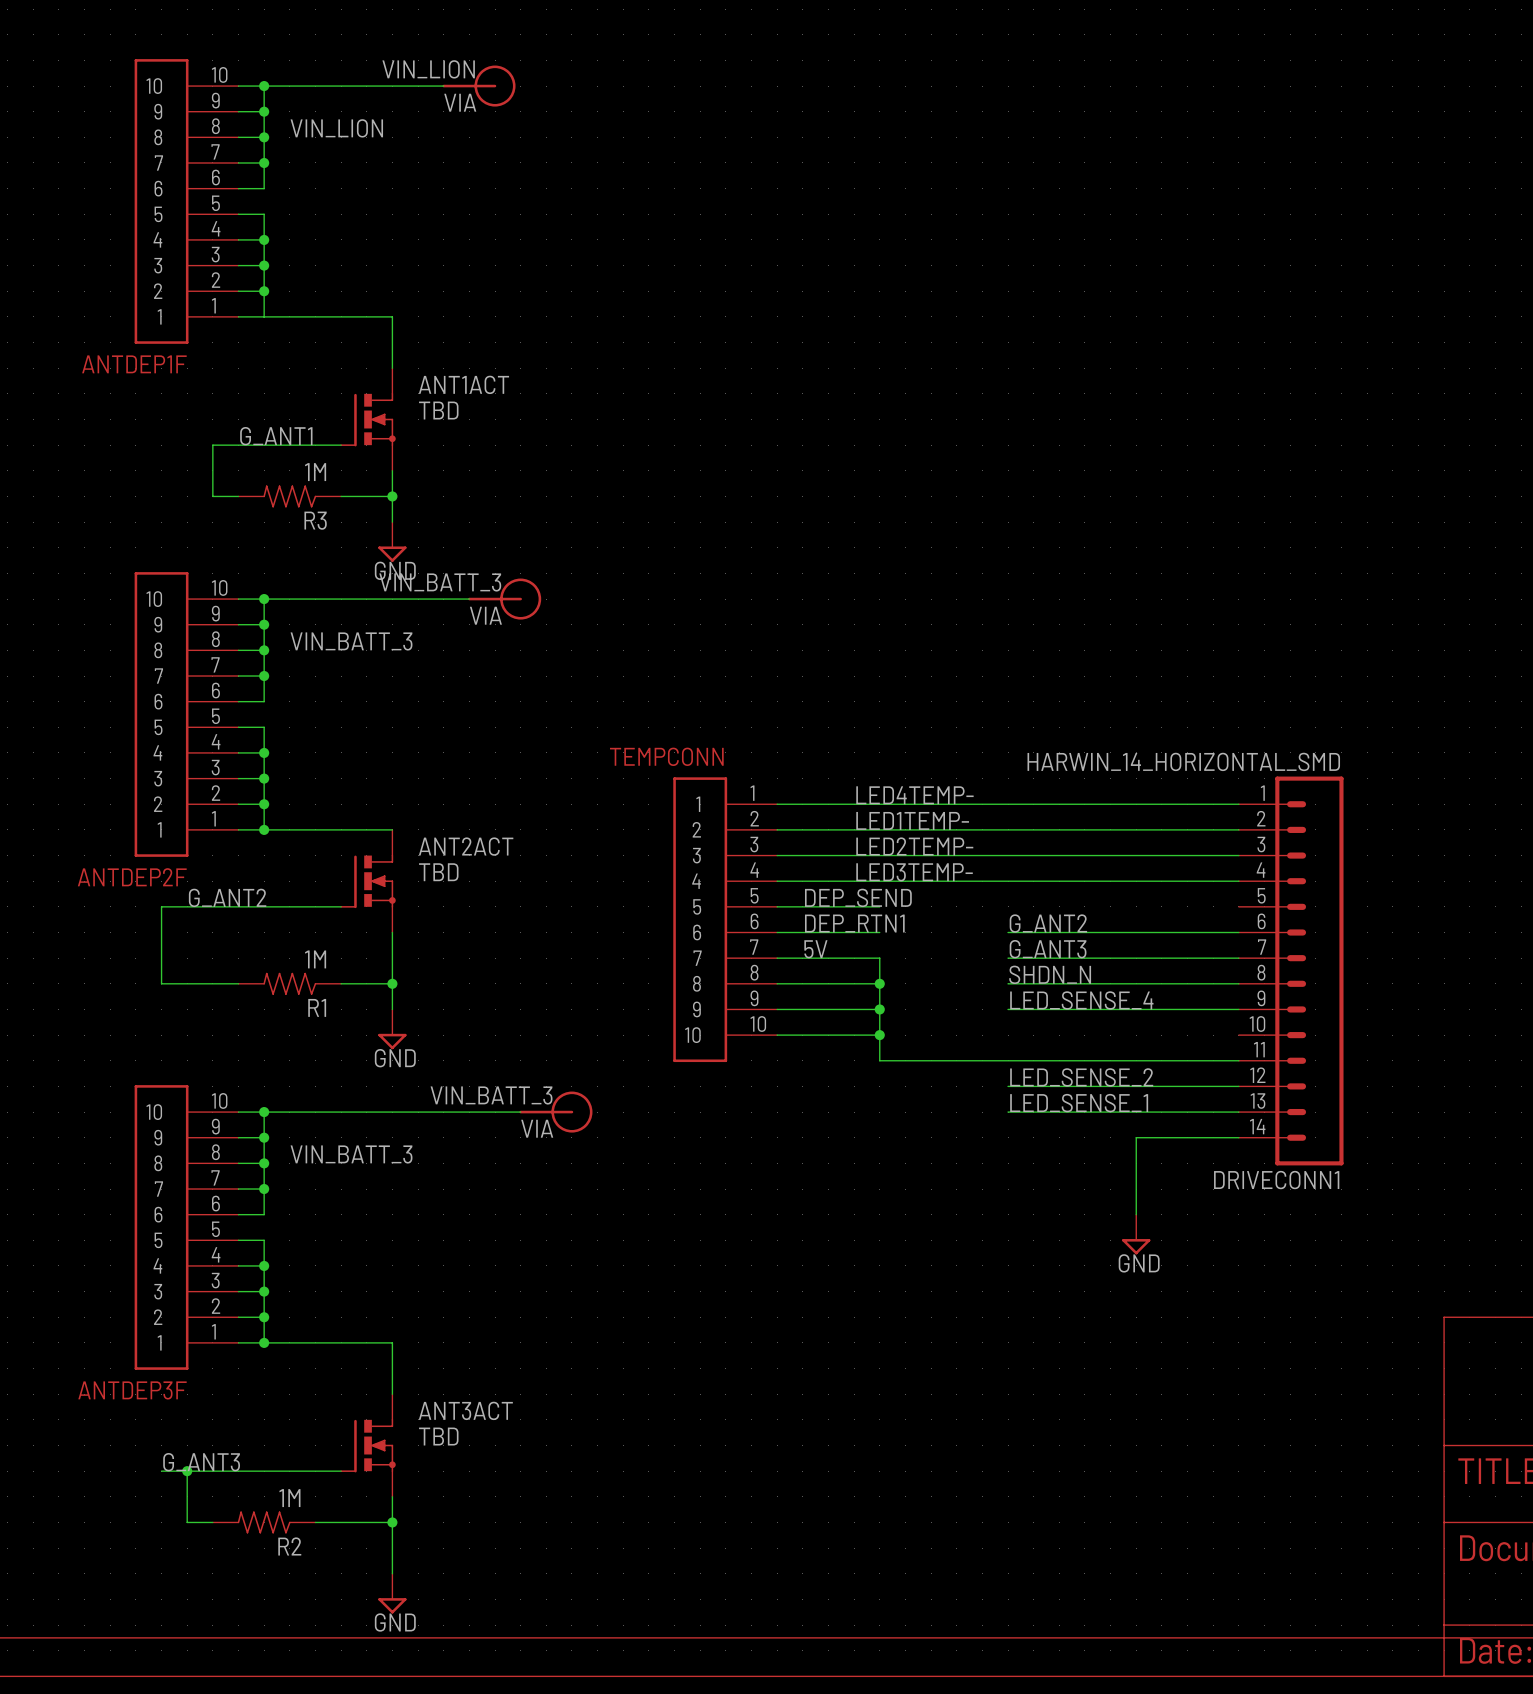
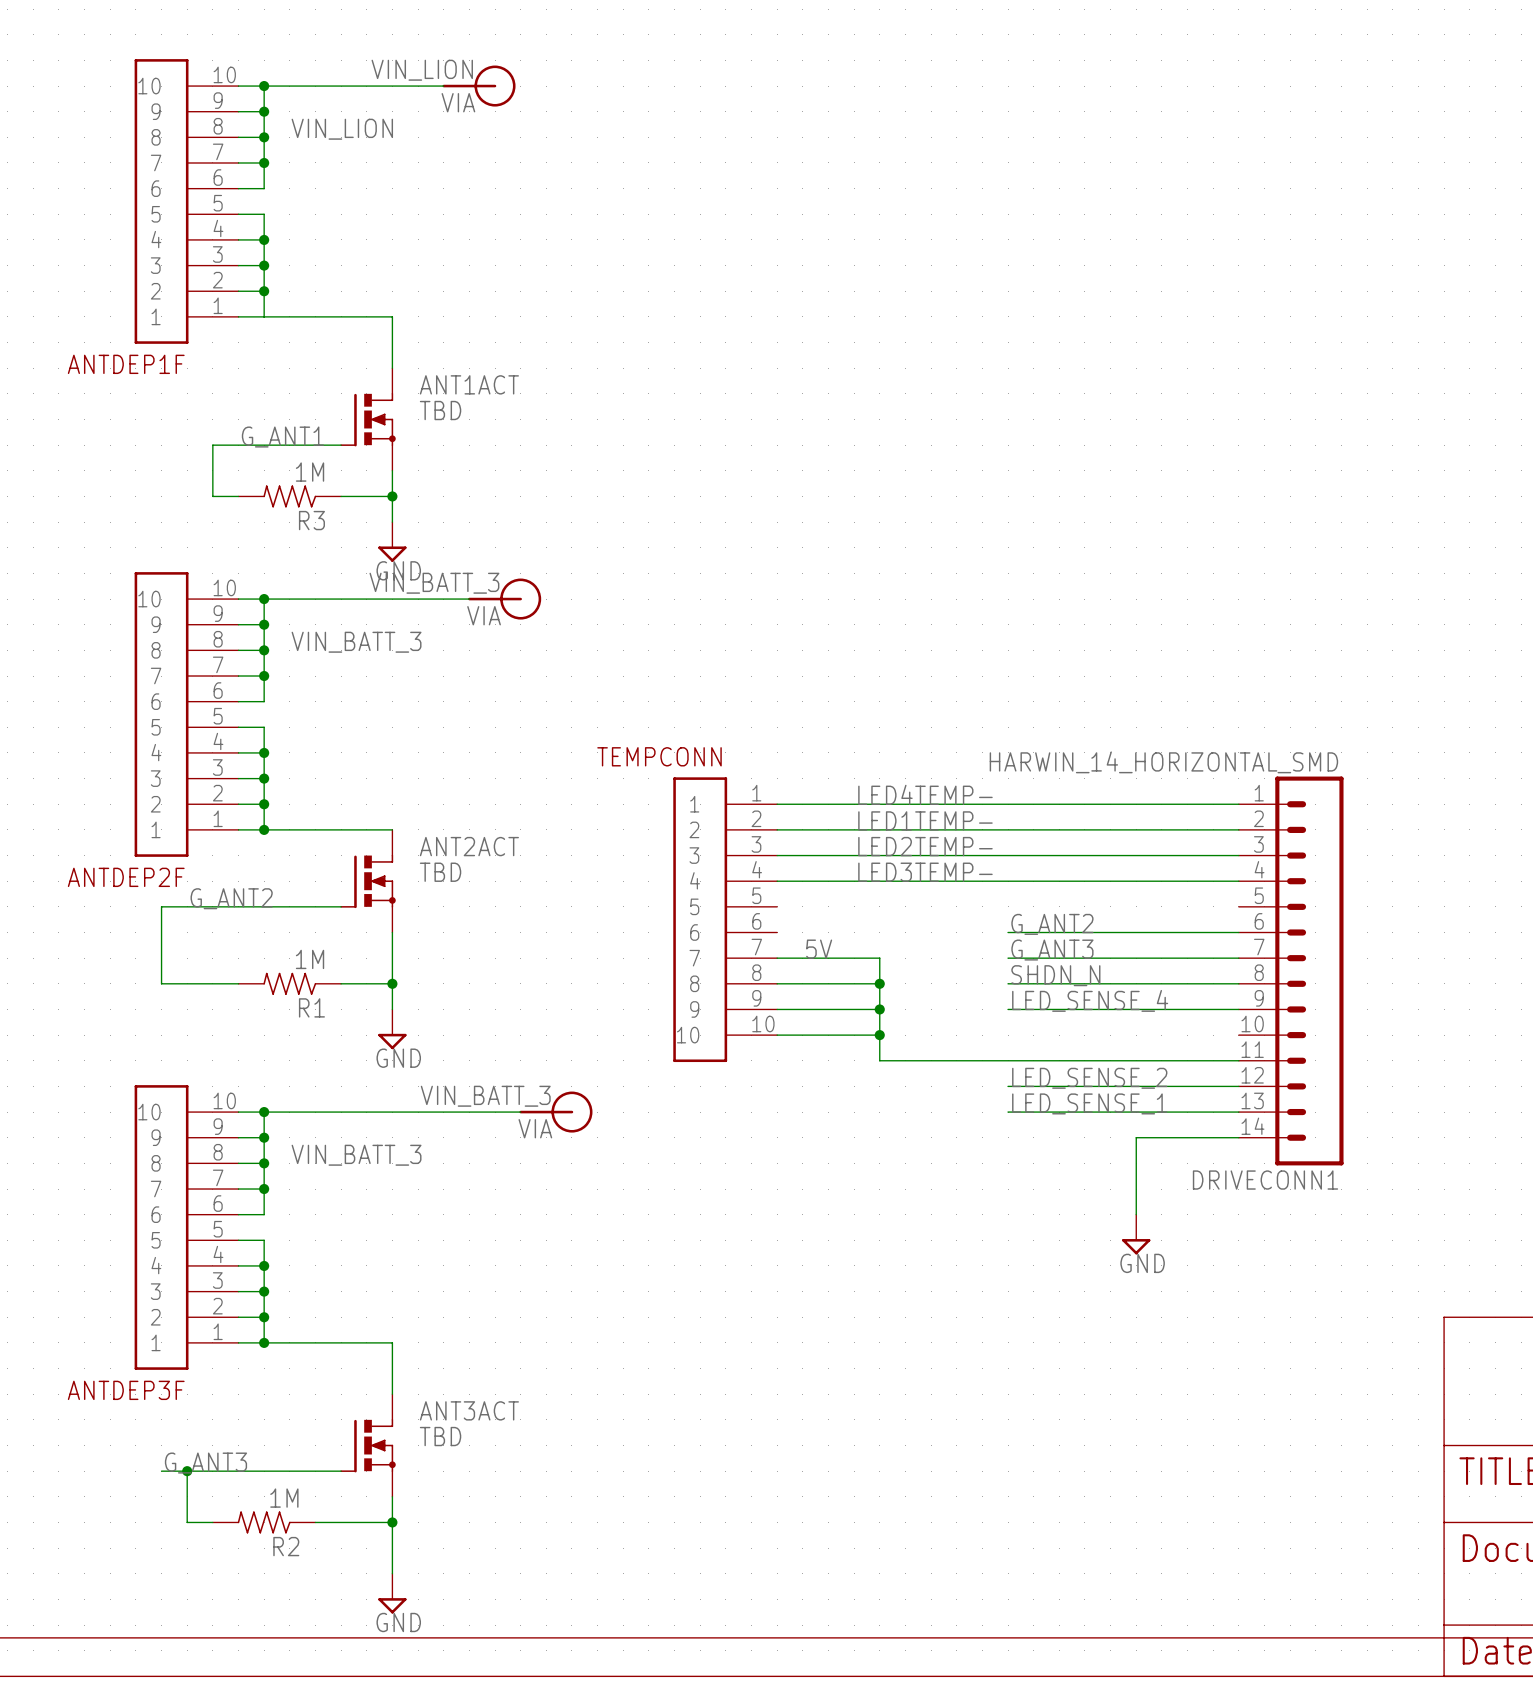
label: DEP_SEND (858, 897) -> none
wire: (777, 906) (879, 906) -> none
label: DEP_RTN1 (854, 923) -> none
wire: (777, 932) (879, 932) -> none

